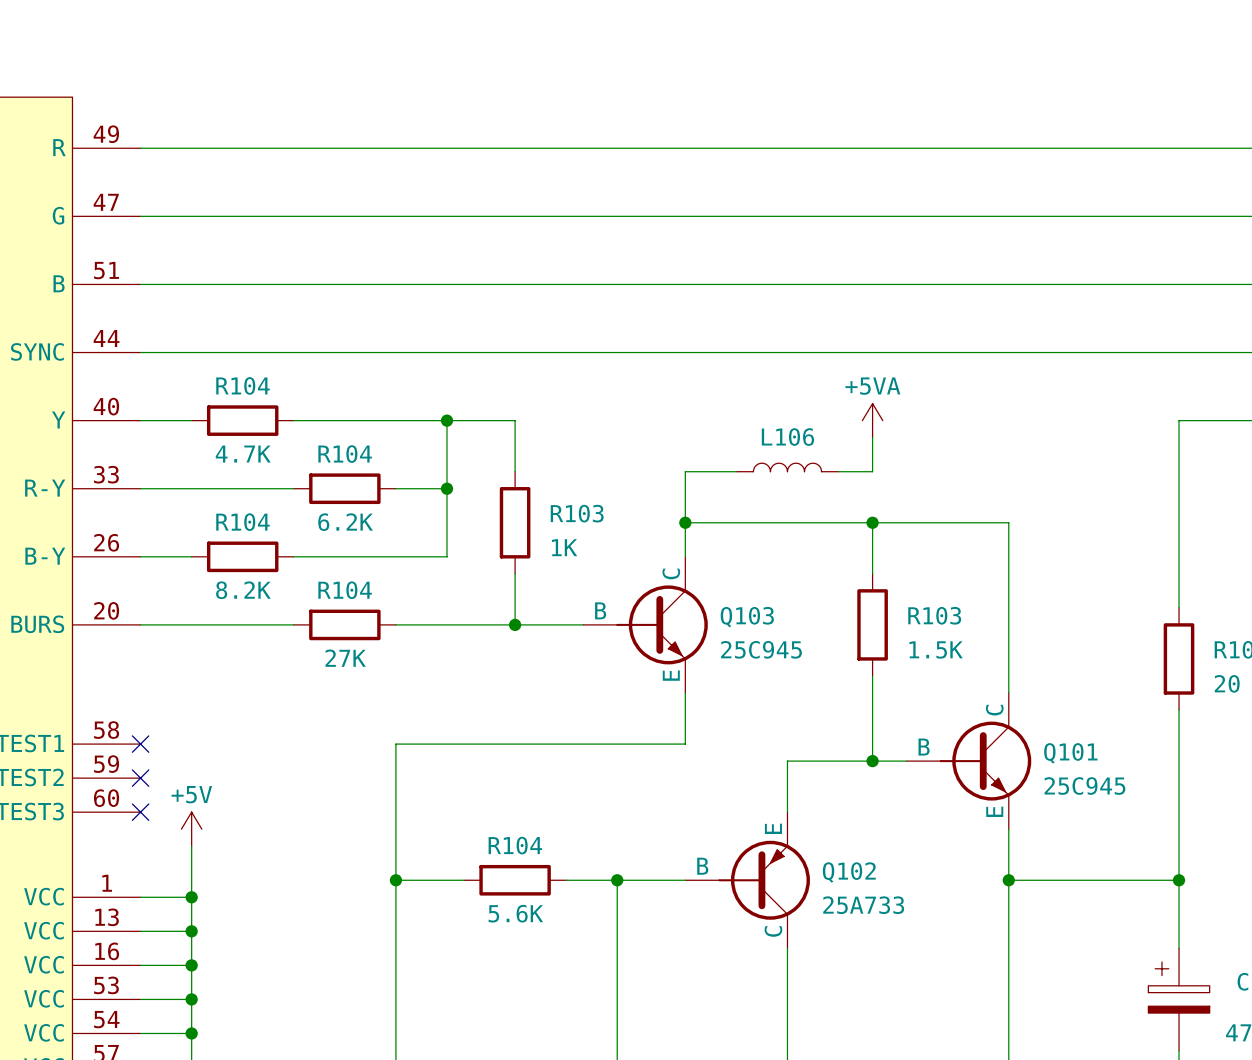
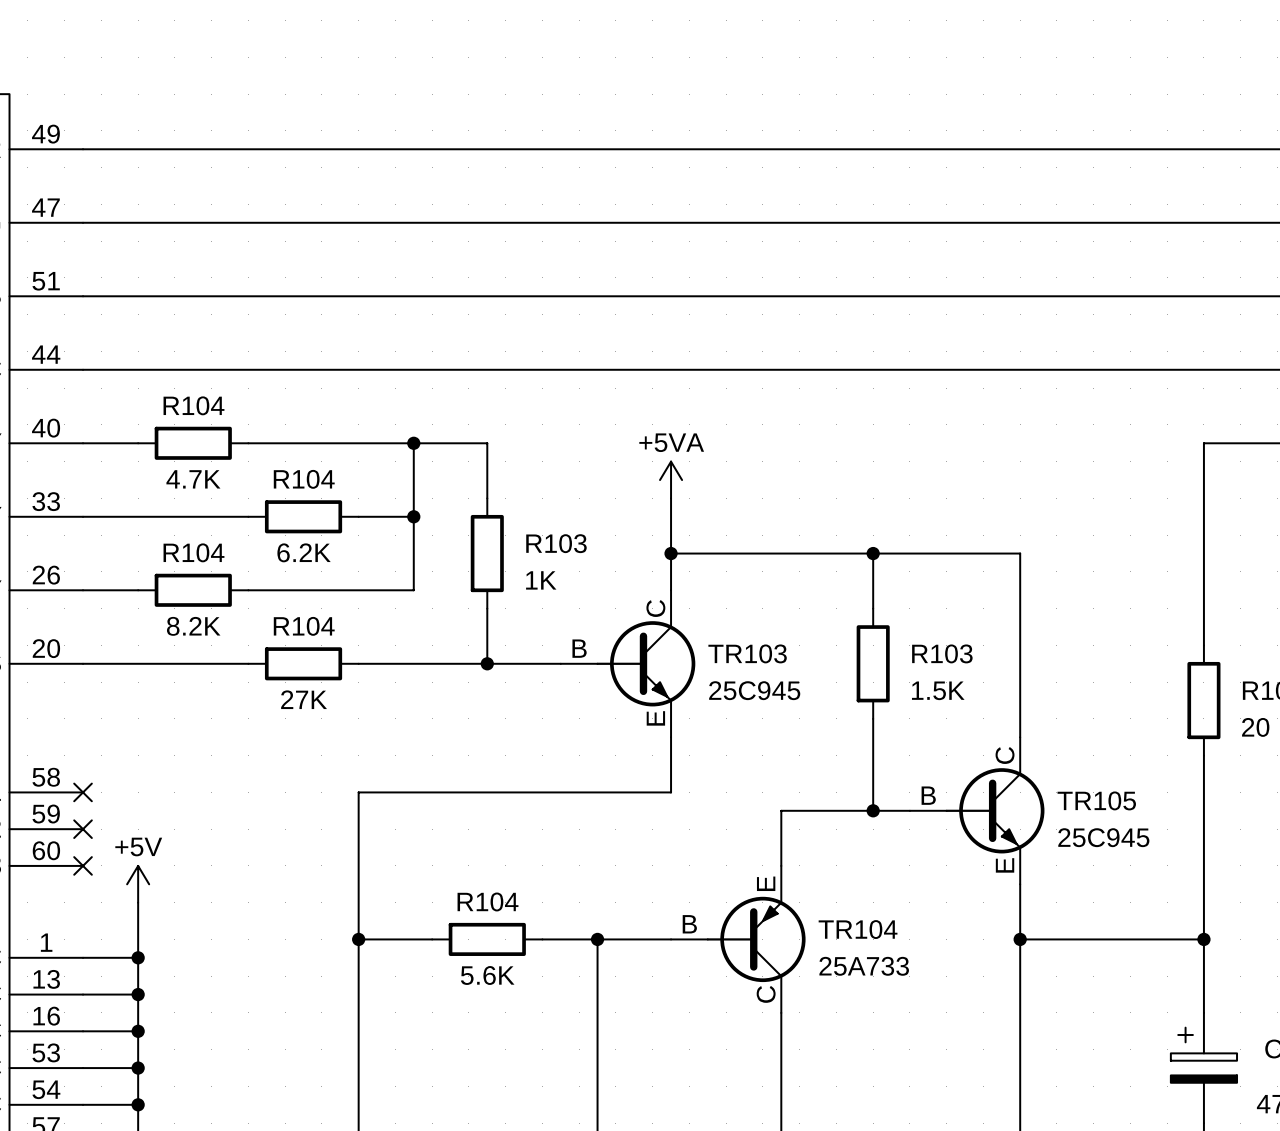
power symbol position: +5VA (872, 420) -> +5VA (671, 480)
wire: (872, 437) (872, 471) (838, 471) -> none
L106: (787, 467) -> none
wire: (685, 471) (736, 471) -> none
Q103 name: Q103 (747, 617) -> TR103 (747, 653)
Q101 name: Q101 (1070, 753) -> TR105 (1096, 800)
Q102 name: Q102 (849, 872) -> TR104 (858, 929)

